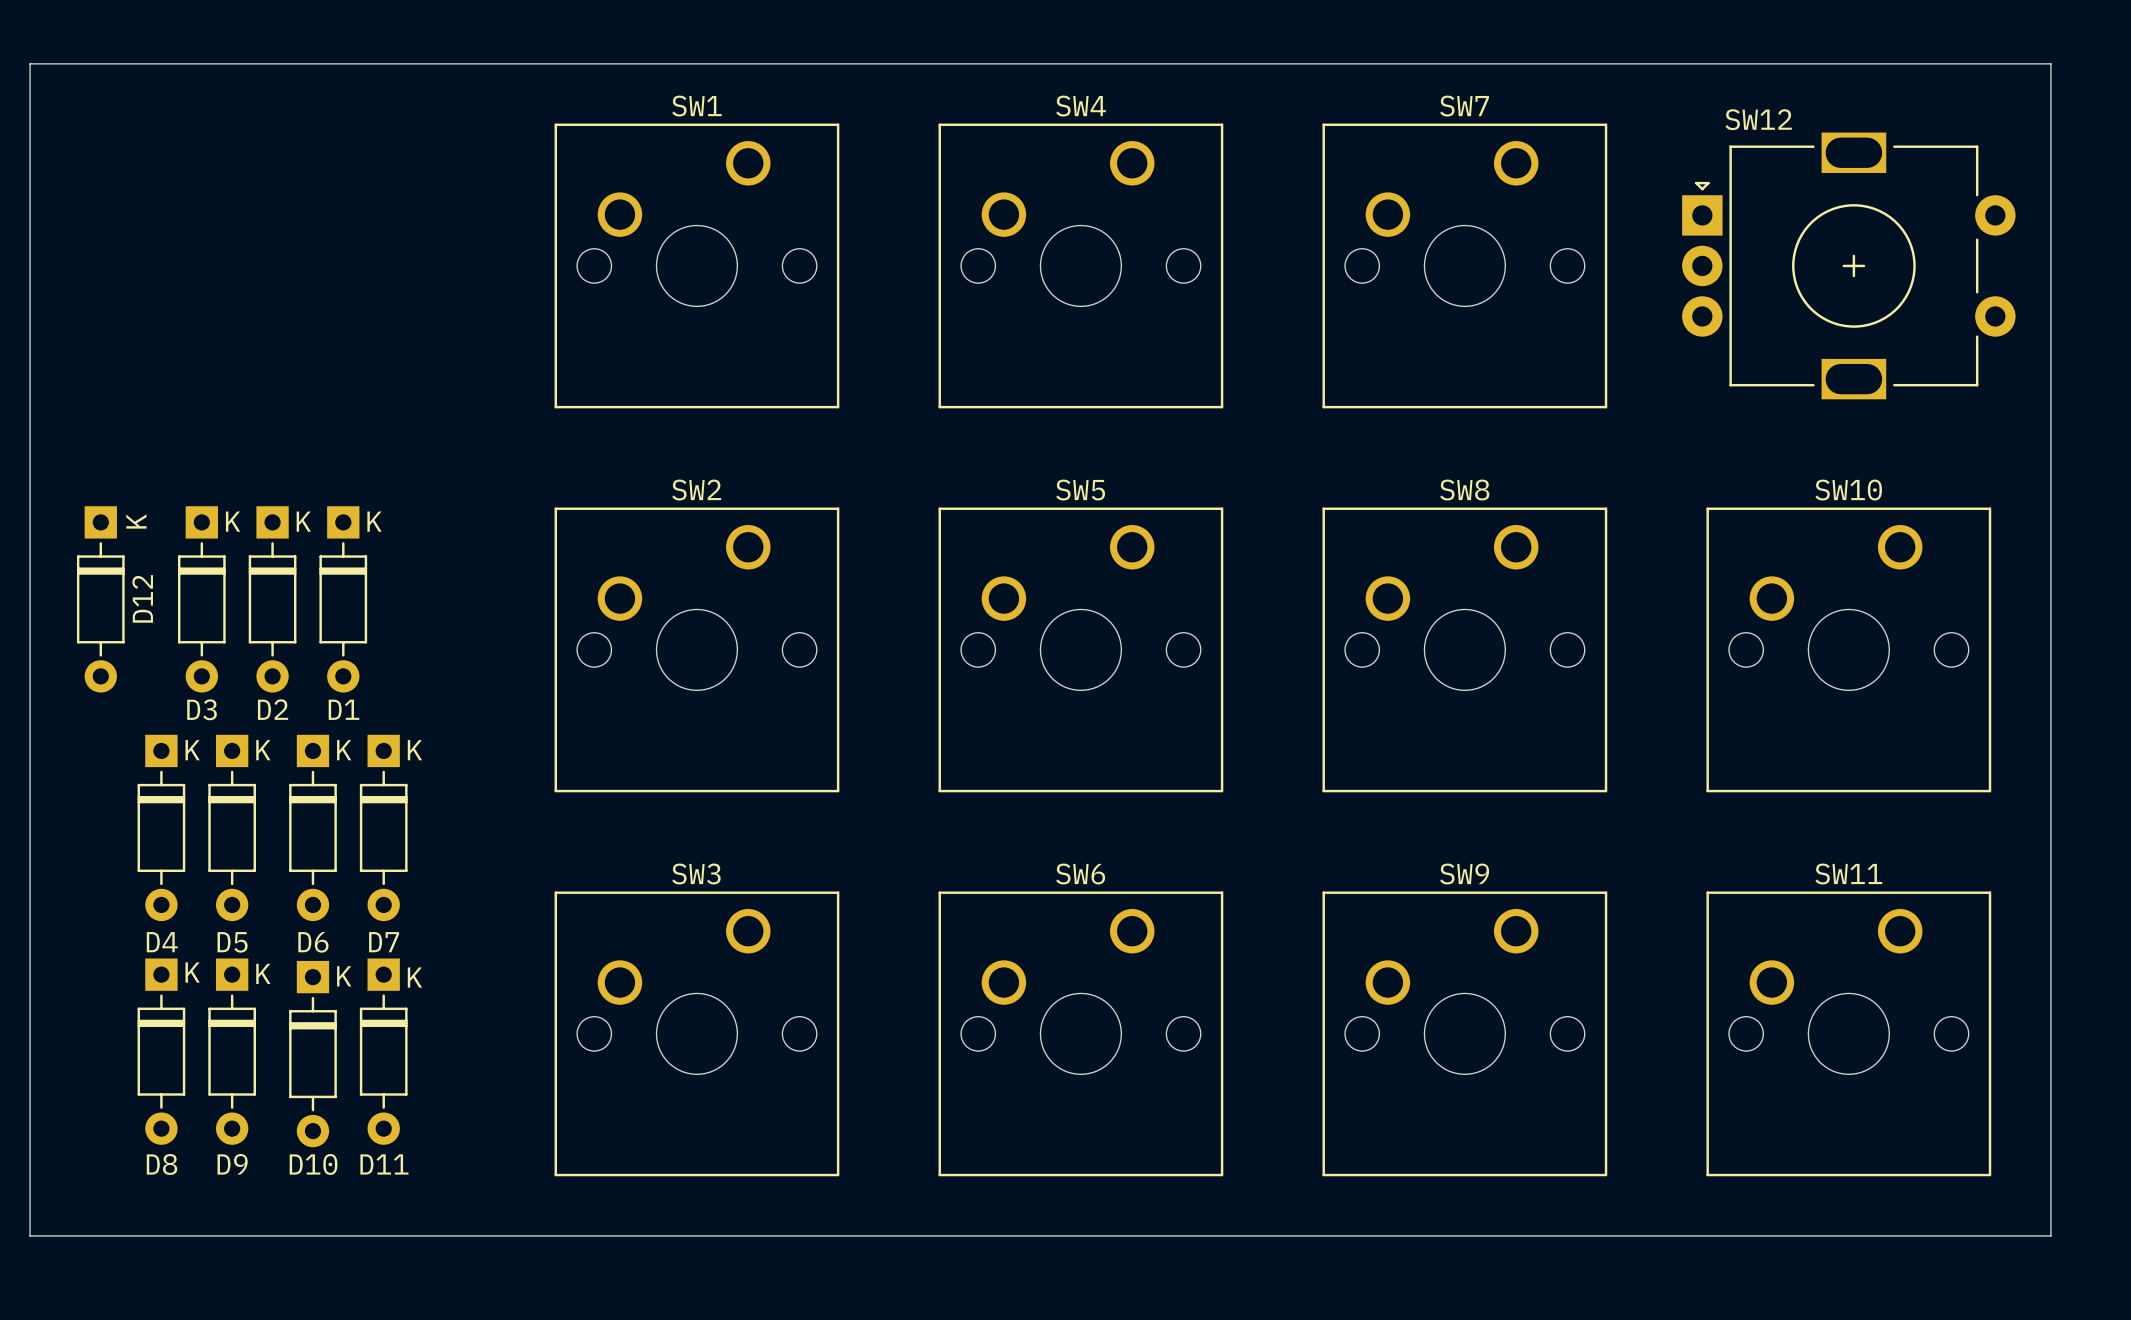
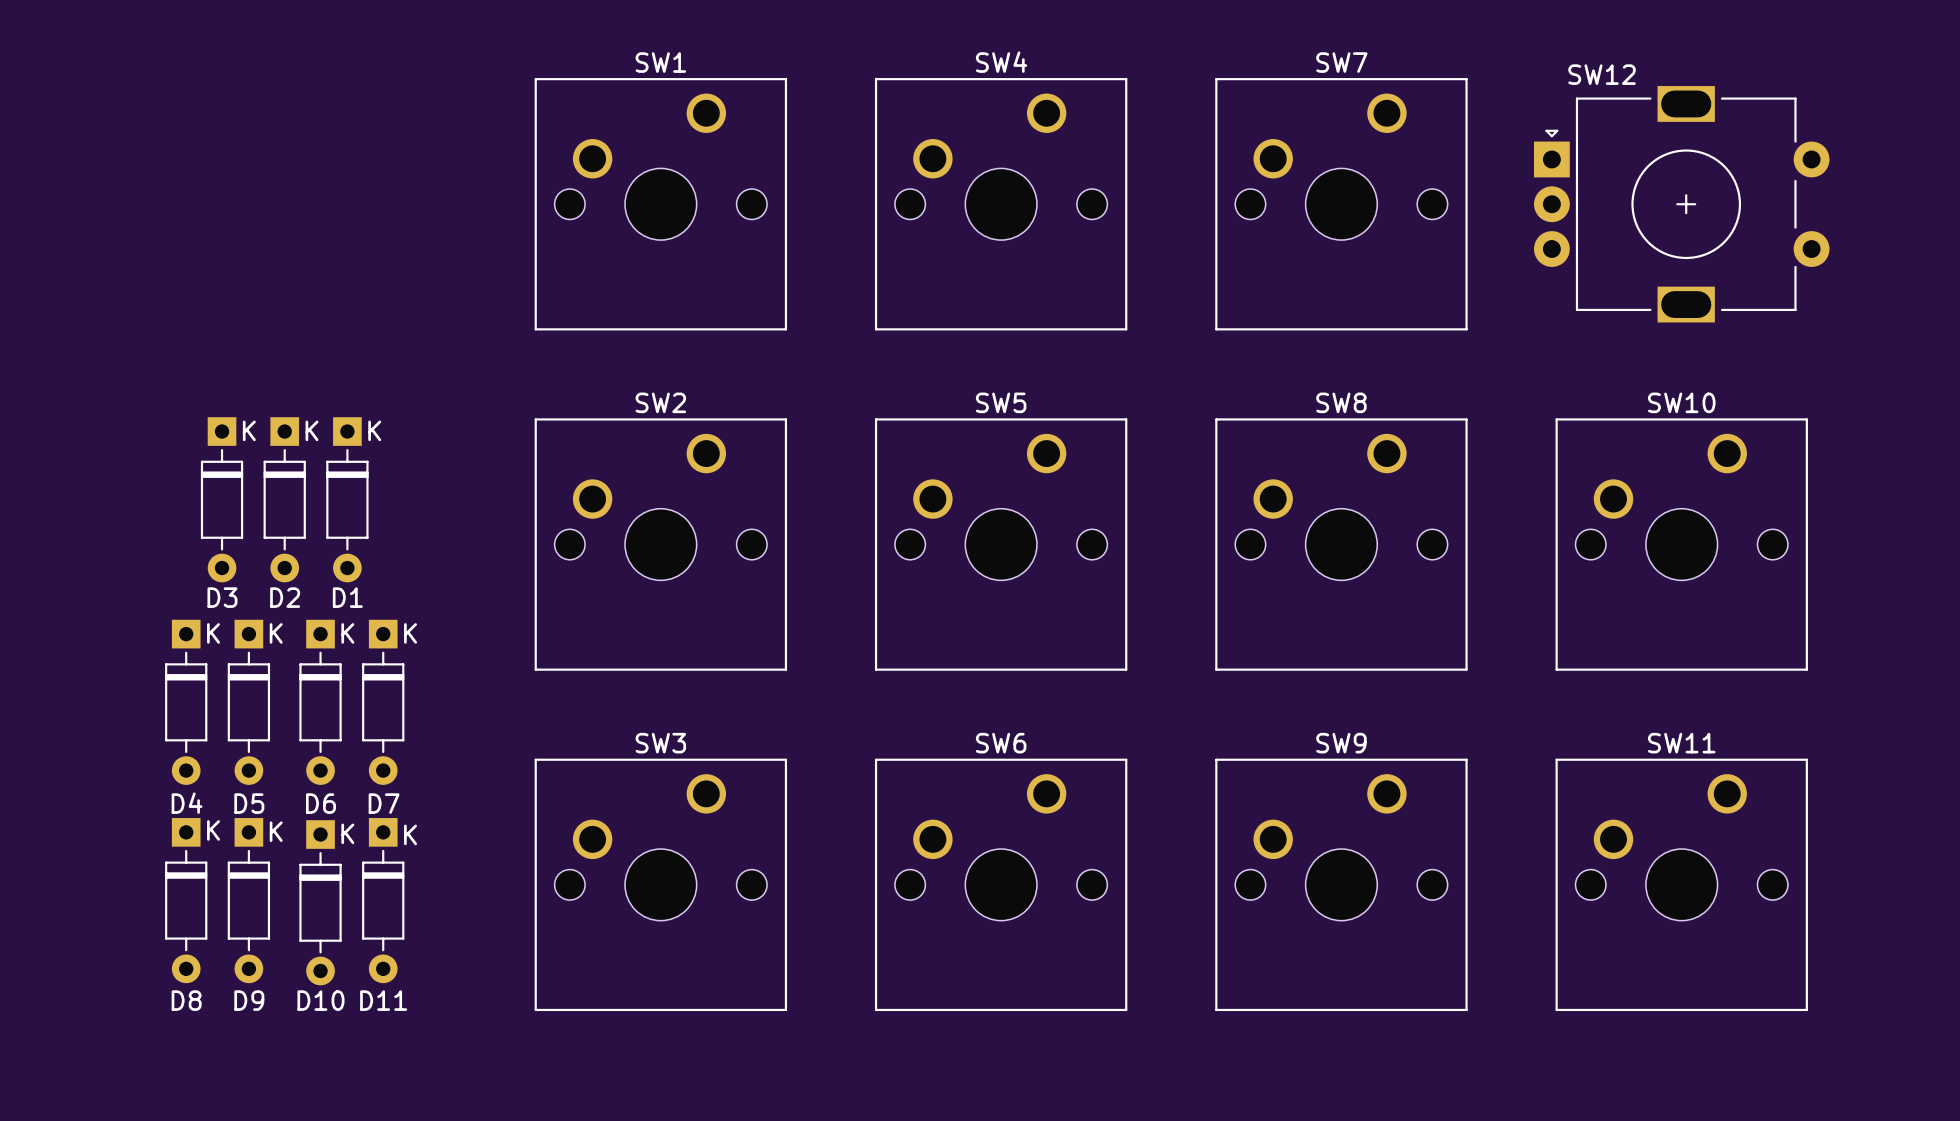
board edge: (30, 63) (2050, 63) (2050, 1235) (30, 1235) (30, 63) -> none
D12: (100, 599) -> none

